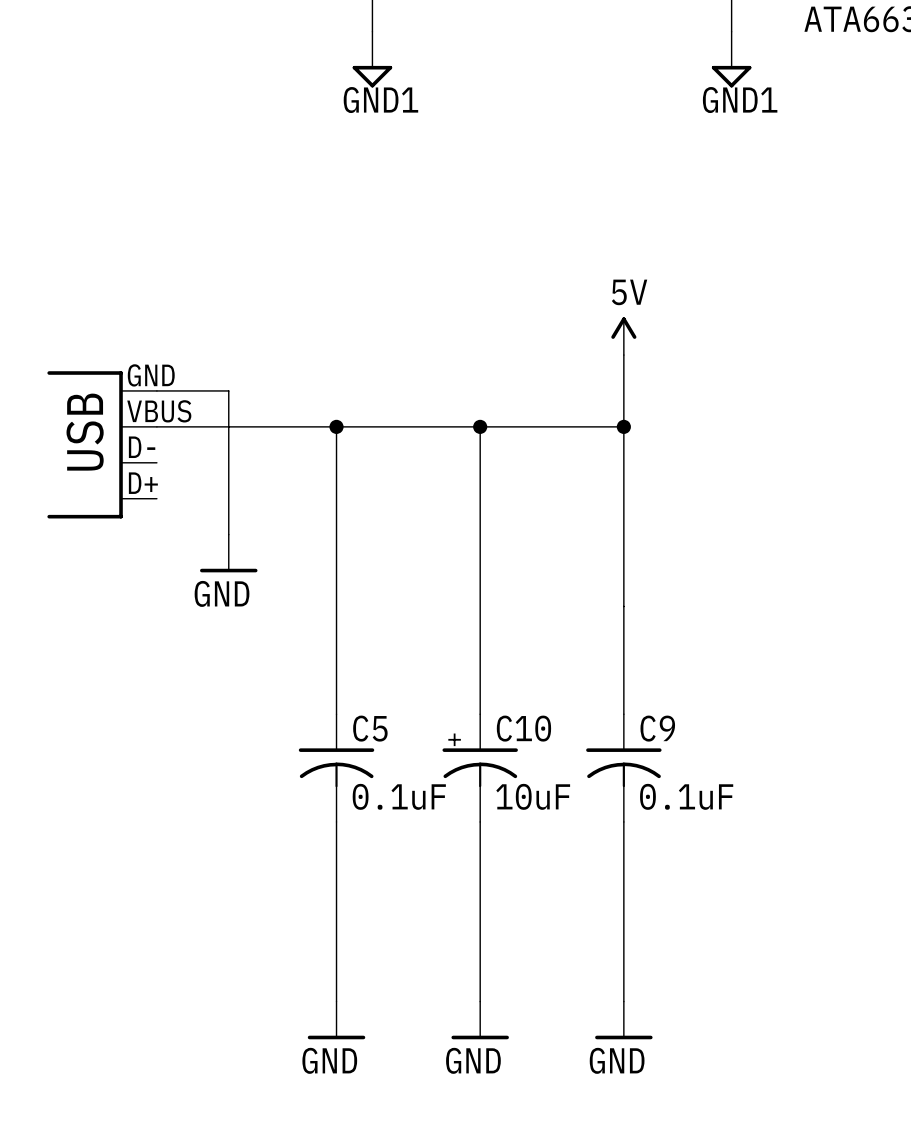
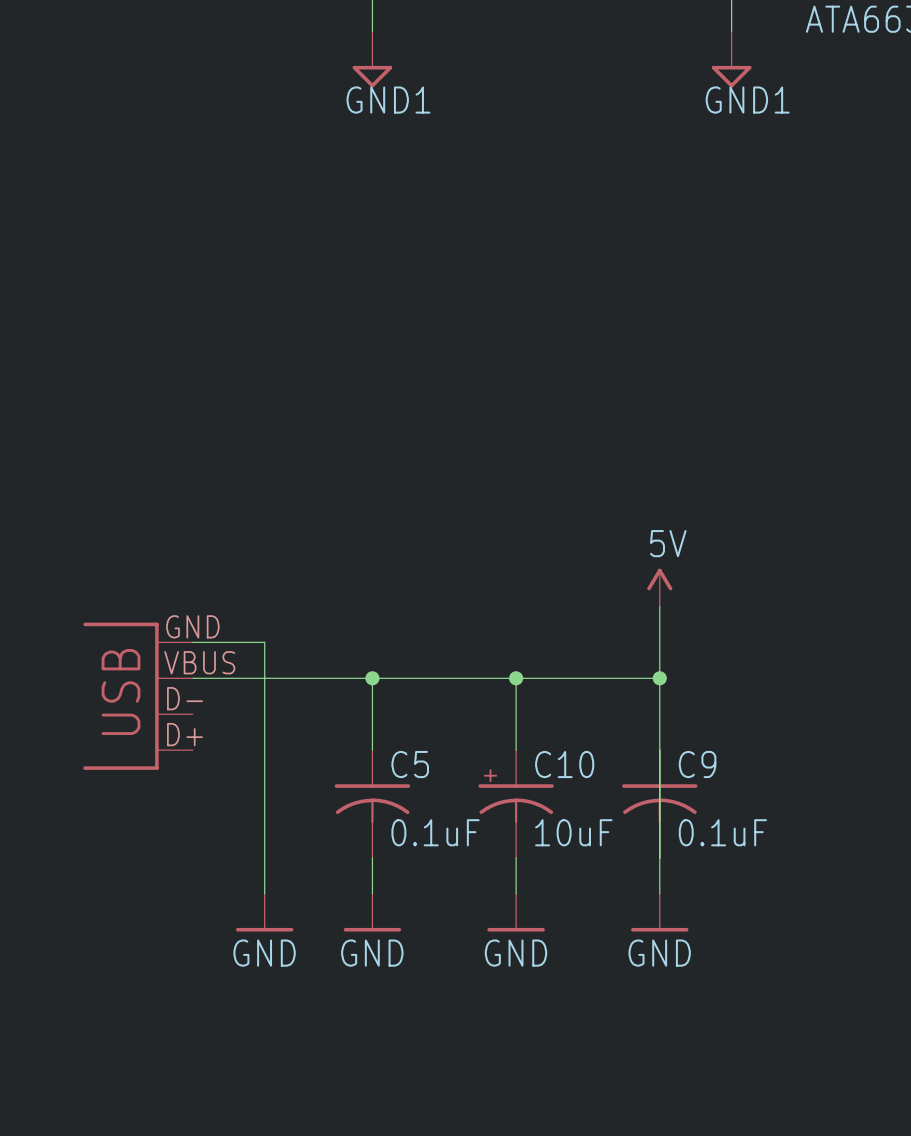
power symbol position: 5V (623, 336) -> 5V (659, 587)
wire: (623, 355) (623, 714) -> none
wire: (156, 390) (228, 390) (228, 534) -> none
wire: (156, 426) (623, 426) -> (192, 678) (659, 678)
wire: (336, 426) (336, 714) -> none
junction: (336, 426) -> none
wire: (480, 426) (480, 714) -> (659, 606) (659, 893)
junction: (480, 426) -> none
junction: (623, 426) -> none
part position: (102, 444) -> (138, 696)
power symbol: GND (228, 553) -> none
wire: none -> (192, 642) (264, 642) (264, 893)
wire: none -> (372, 678) (372, 750)
junction: none -> (372, 678)
wire: none -> (516, 678) (516, 750)
junction: none -> (516, 678)
junction: none -> (659, 678)
C5 position: (336, 768) -> (372, 804)
C10 position: (480, 768) -> (516, 804)
C9 position: (623, 768) -> (659, 804)
wire: (336, 821) (336, 1001) -> none
wire: (480, 821) (480, 1001) -> none
wire: (623, 821) (623, 1001) -> none
wire: none -> (372, 857) (372, 893)
wire: none -> (516, 857) (516, 893)
power symbol: none -> GND (264, 912)
power symbol: none -> GND (372, 912)
power symbol: none -> GND (516, 912)
power symbol: none -> GND (659, 912)
power symbol: GND (336, 1020) -> none
power symbol: GND (480, 1020) -> none
power symbol: GND (623, 1020) -> none

